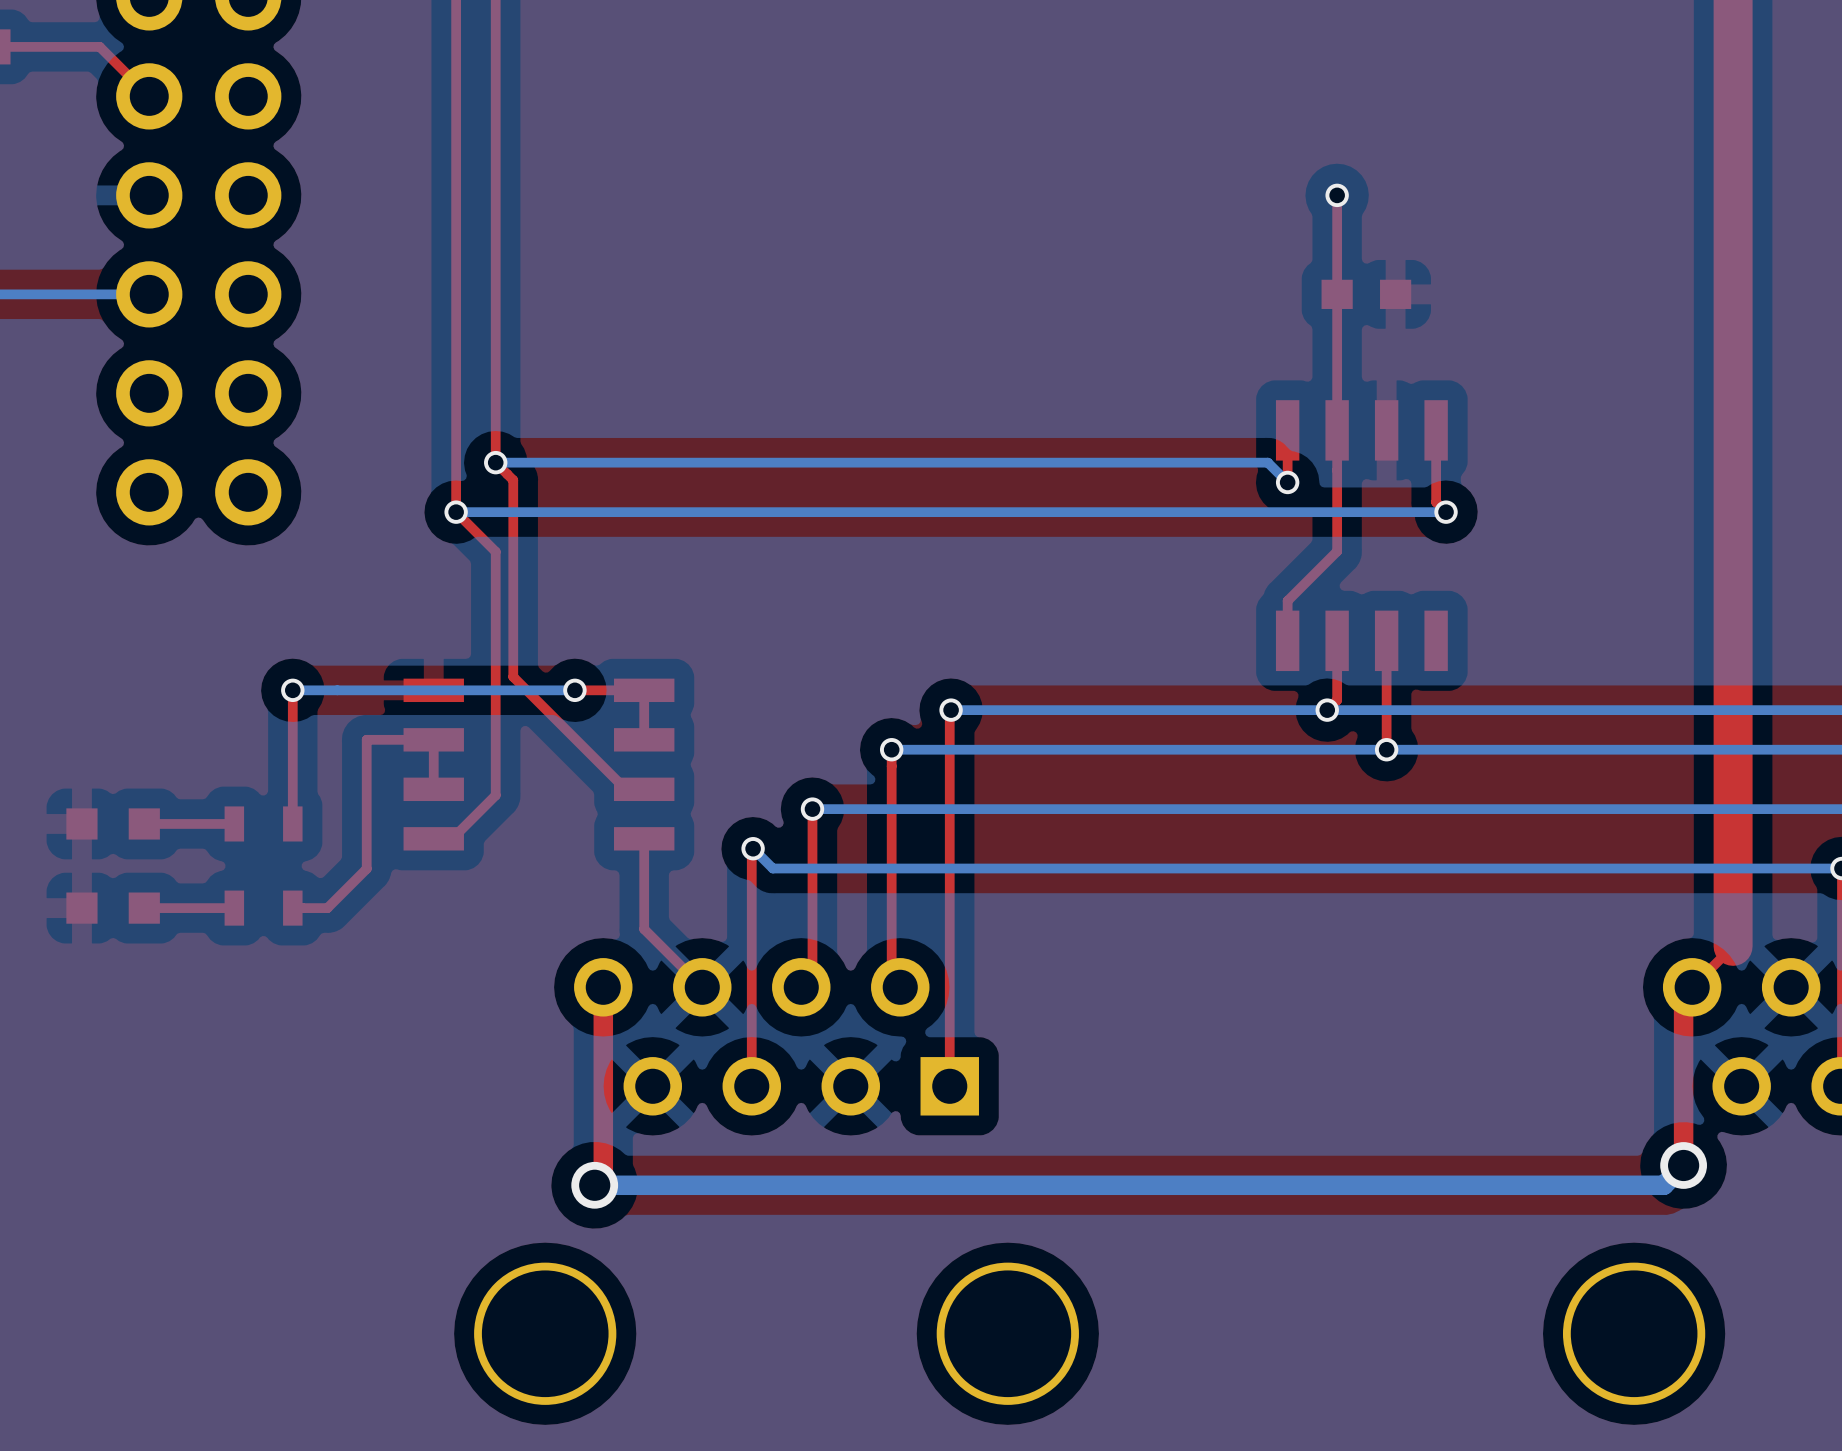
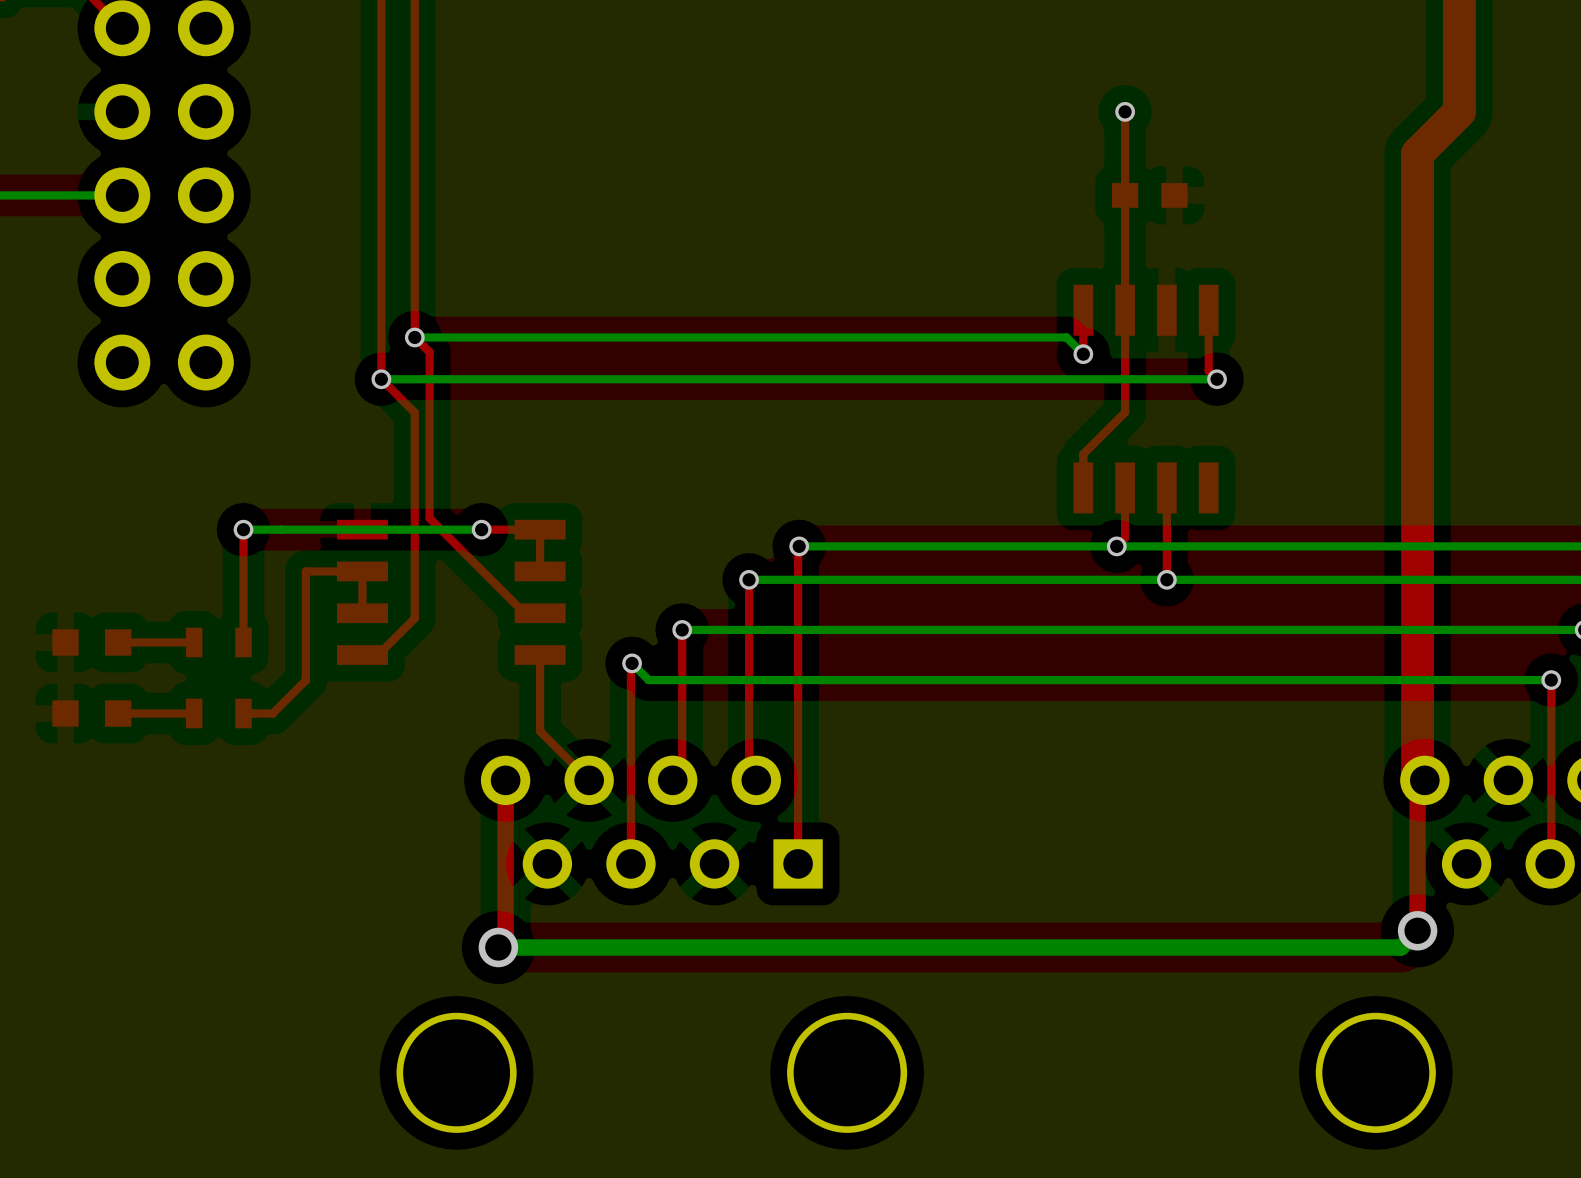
top track: (1733, 195) (1733, 946) (1692, 987) -> (1459, 111) (1417, 153) (1417, 773) (1424, 780)

